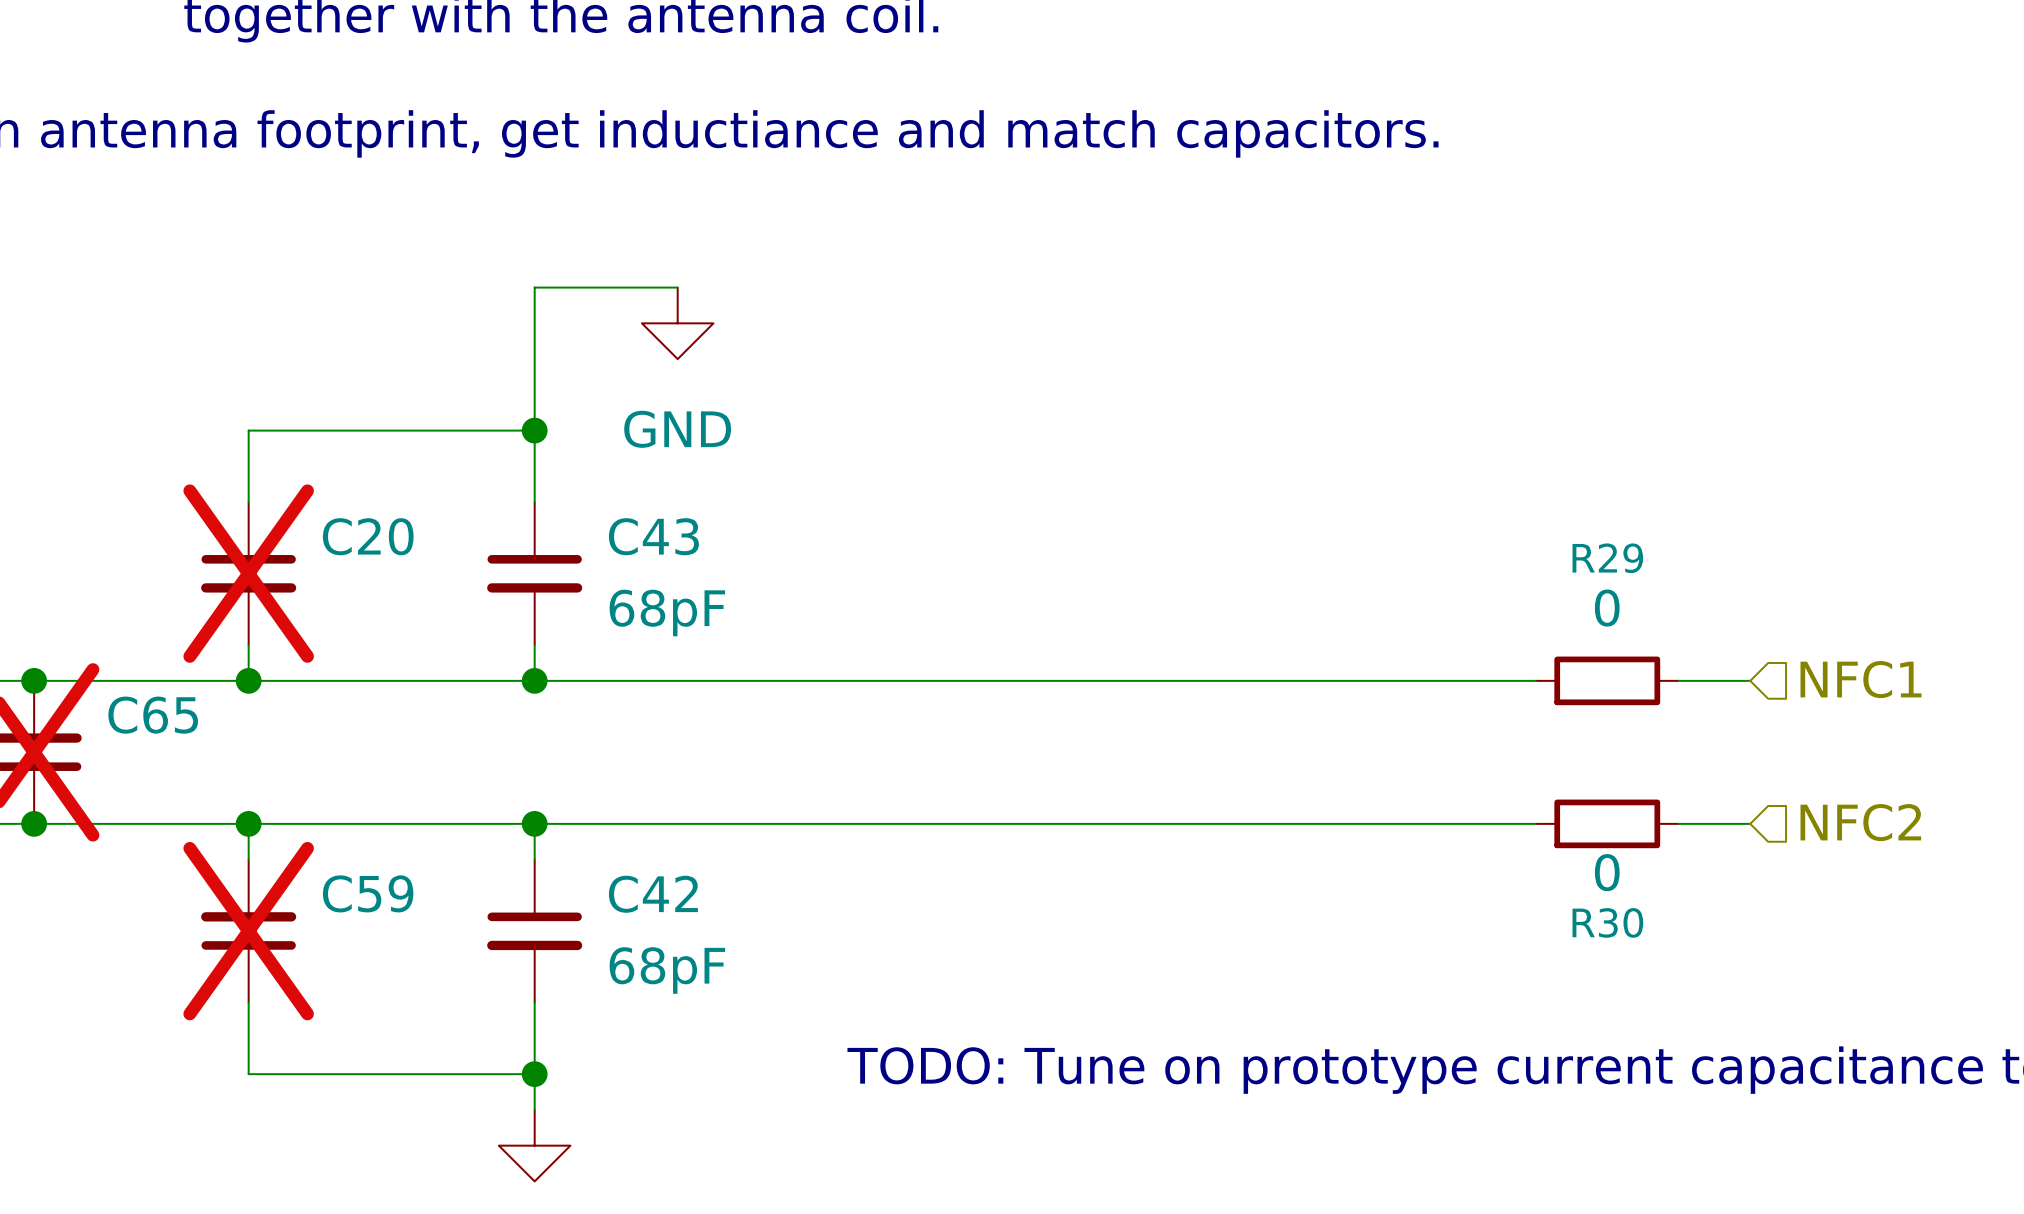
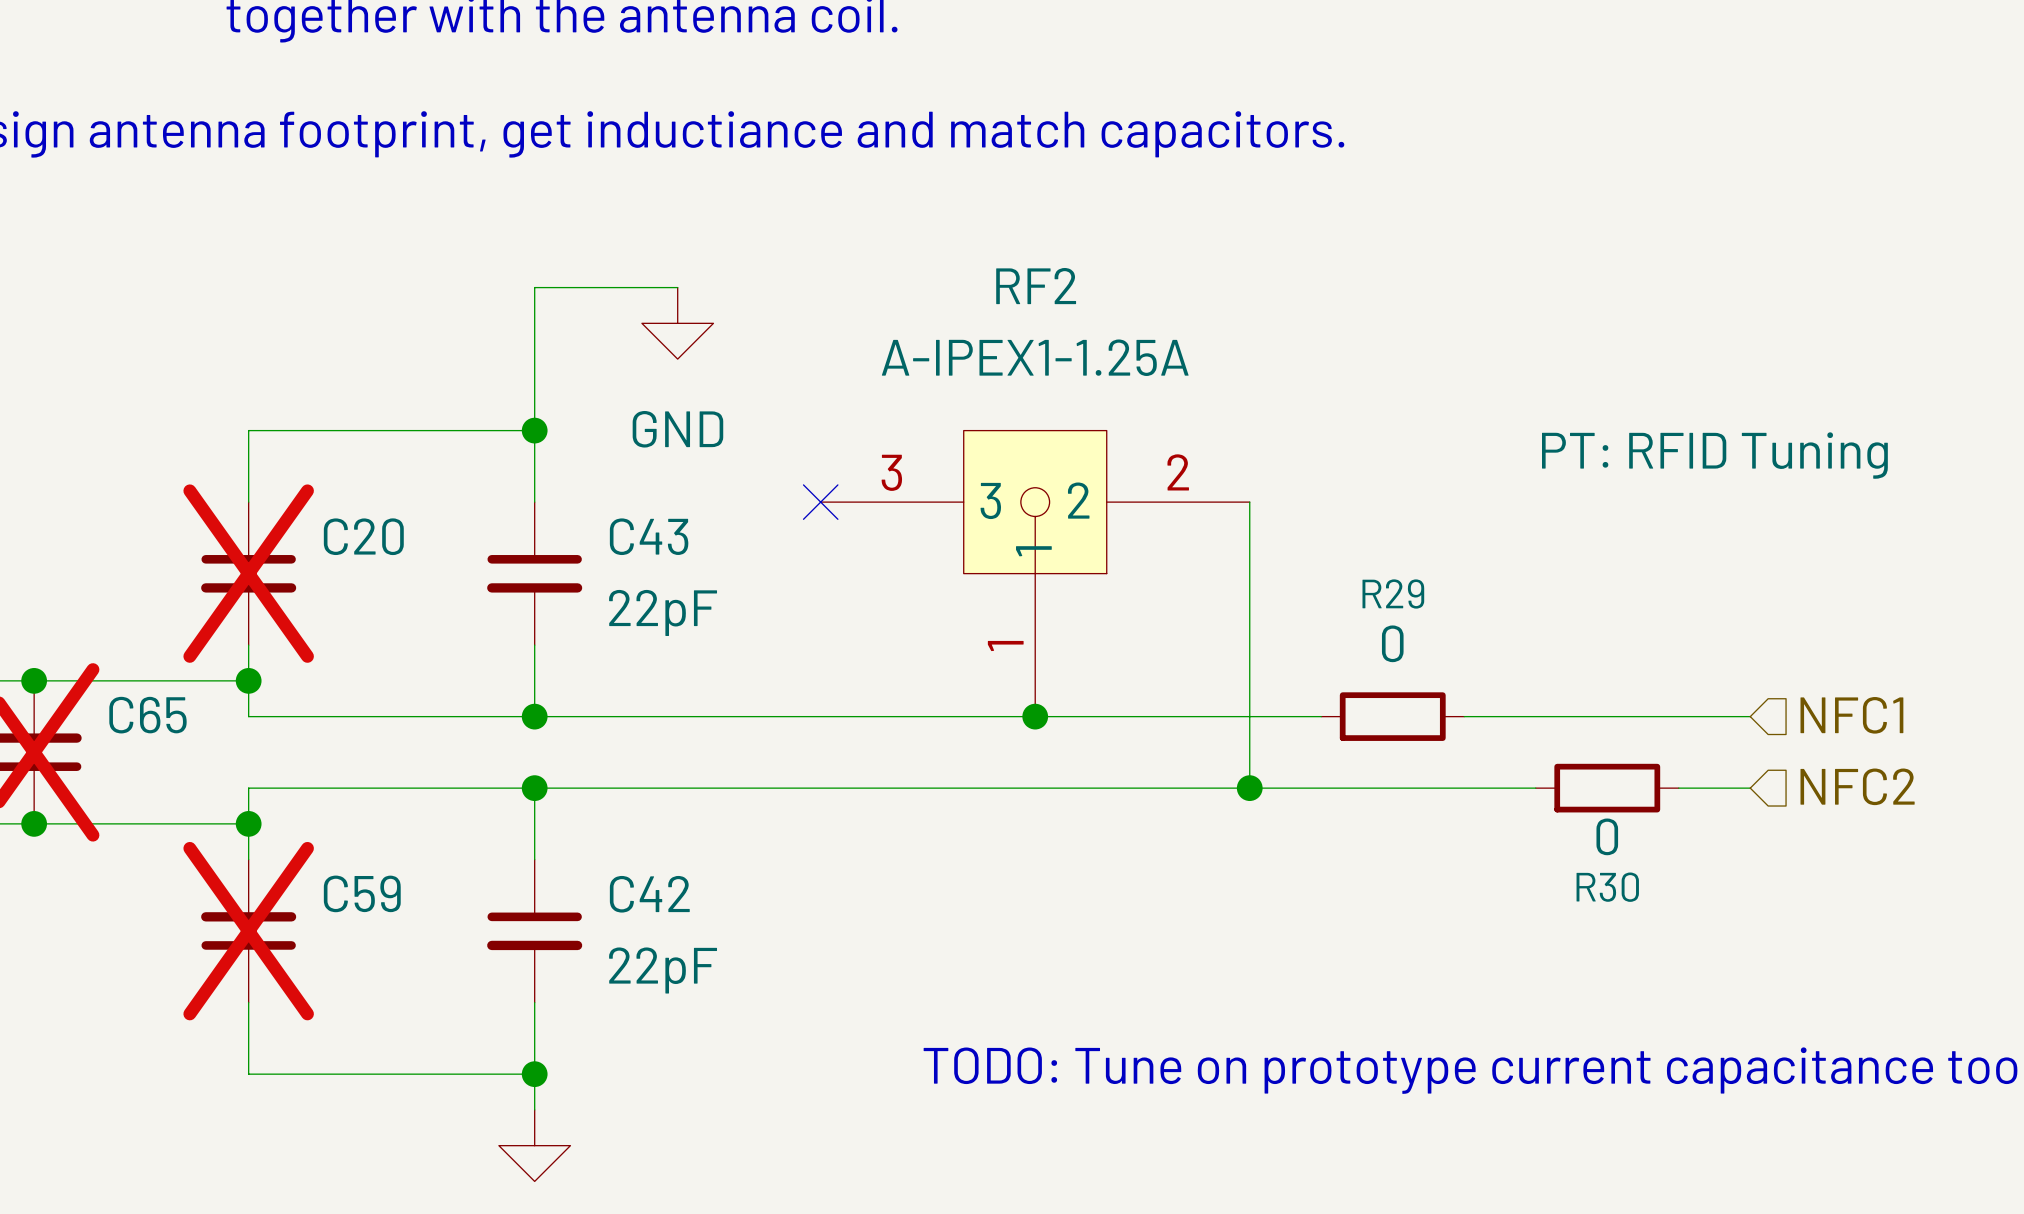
no-connect mark: none -> (820, 502)
wire: none -> (1249, 502) (1249, 788)
RF2: none -> A-IPEX1-1.25A (1035, 573)
C43 value: 68pF (667, 612) -> 22pF (663, 612)
hierarchical label position: NFC1 (1861, 679) -> NFC1 (1851, 715)
wire: (248, 680) (1535, 680) -> (248, 680) (248, 716) (1321, 716)
wire: none -> (534, 680) (534, 716)
junction position: (534, 680) -> (534, 716)
R29 position: (1607, 680) -> (1392, 716)
wire: (1678, 680) (1750, 680) -> none
junction: none -> (1035, 716)
wire: none -> (1464, 716) (1750, 716)
wire: none -> (534, 788) (534, 823)
junction: none -> (1249, 788)
hierarchical label position: NFC2 (1860, 822) -> NFC2 (1857, 786)
wire: (248, 823) (1535, 823) -> (248, 823) (248, 788) (1535, 788)
junction position: (534, 823) -> (534, 788)
R30 position: (1607, 823) -> (1607, 788)
wire: (1678, 823) (1750, 823) -> (1678, 788) (1750, 788)
C42 value: 68pF (667, 970) -> 22pF (663, 970)

